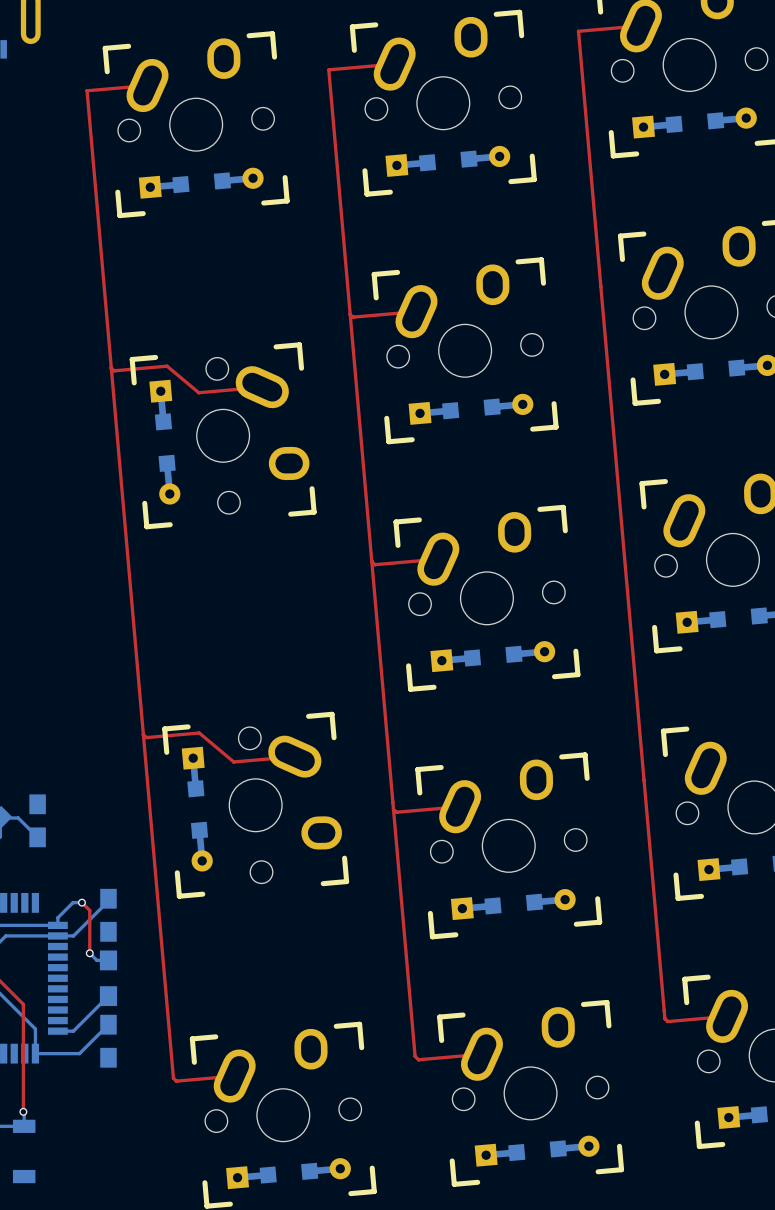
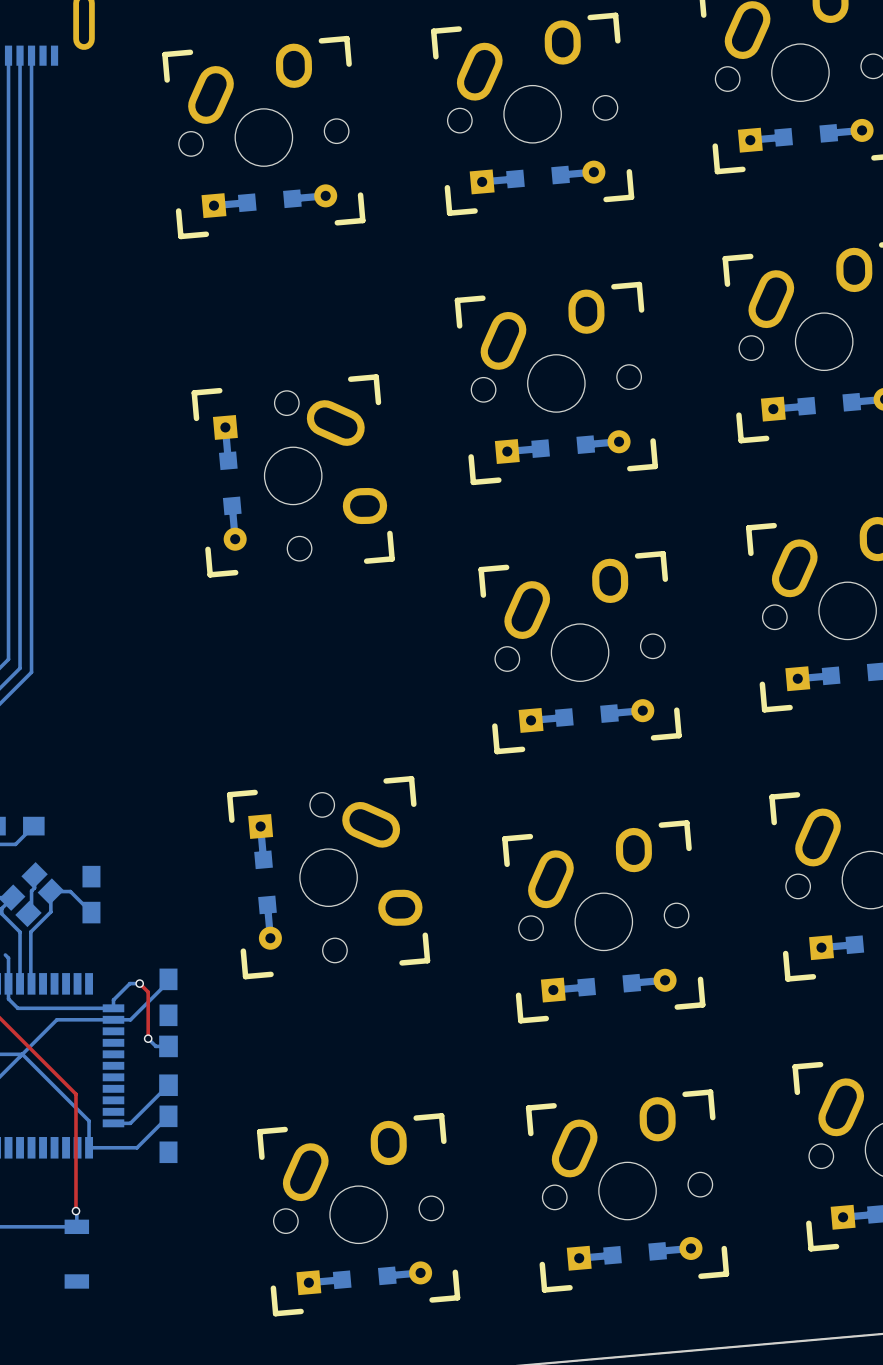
top track: (640, 25) (578, 31) (664, 1018) (668, 1021) (727, 1016) -> none
top track: (394, 64) (328, 69) (415, 1056) (418, 1059) (481, 1054) -> none
top track: (147, 85) (87, 90) (173, 1078) (176, 1081) (234, 1076) -> none
top track: (416, 311) (353, 317) (350, 314) -> none
top track: (111, 368) (115, 370) (167, 366) (198, 392) -> none
top track: (262, 387) (198, 392) -> none
top track: (438, 559) (375, 564) (371, 561) -> none
top track: (143, 734) (147, 737) (199, 732) (233, 761) (294, 756) -> none
top track: (460, 806) (397, 812) (393, 809) -> none

